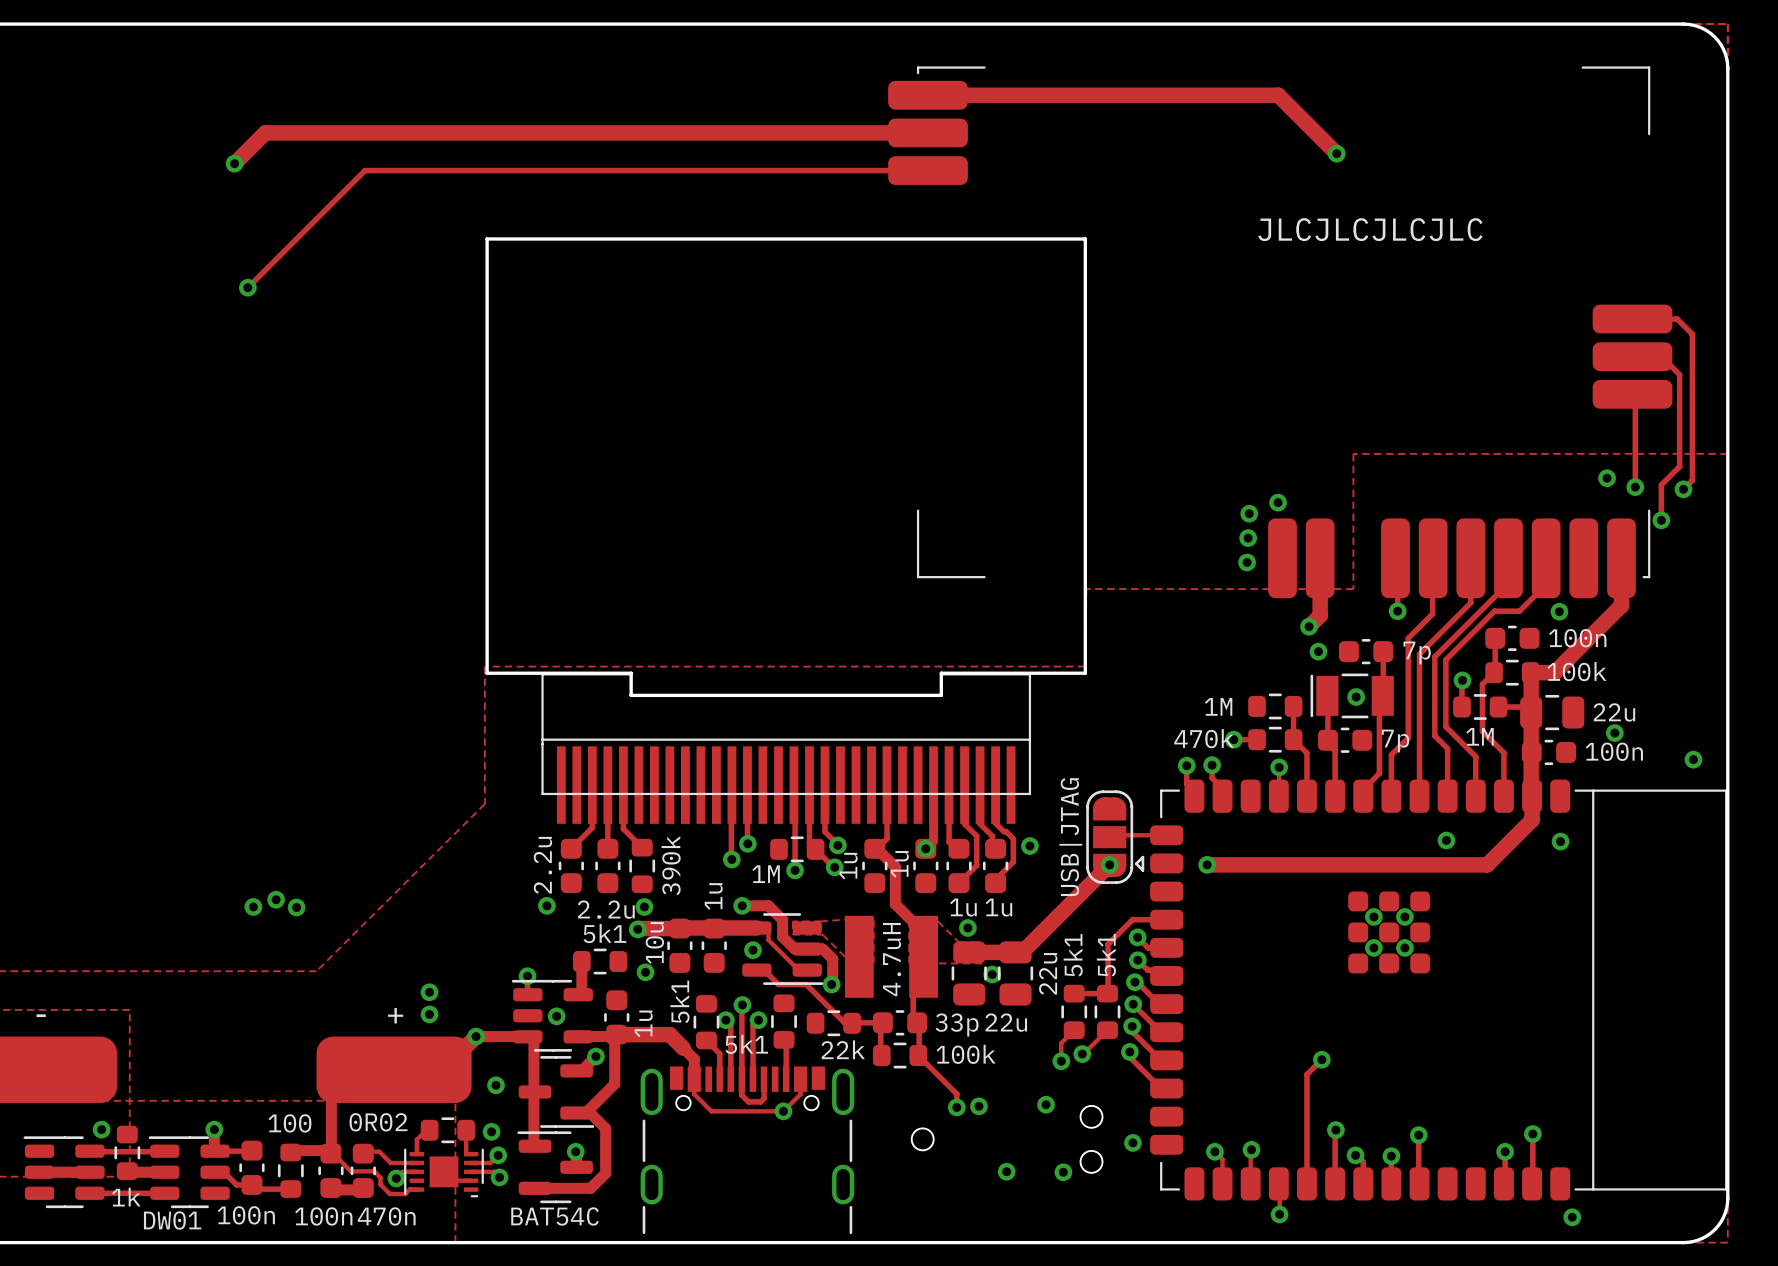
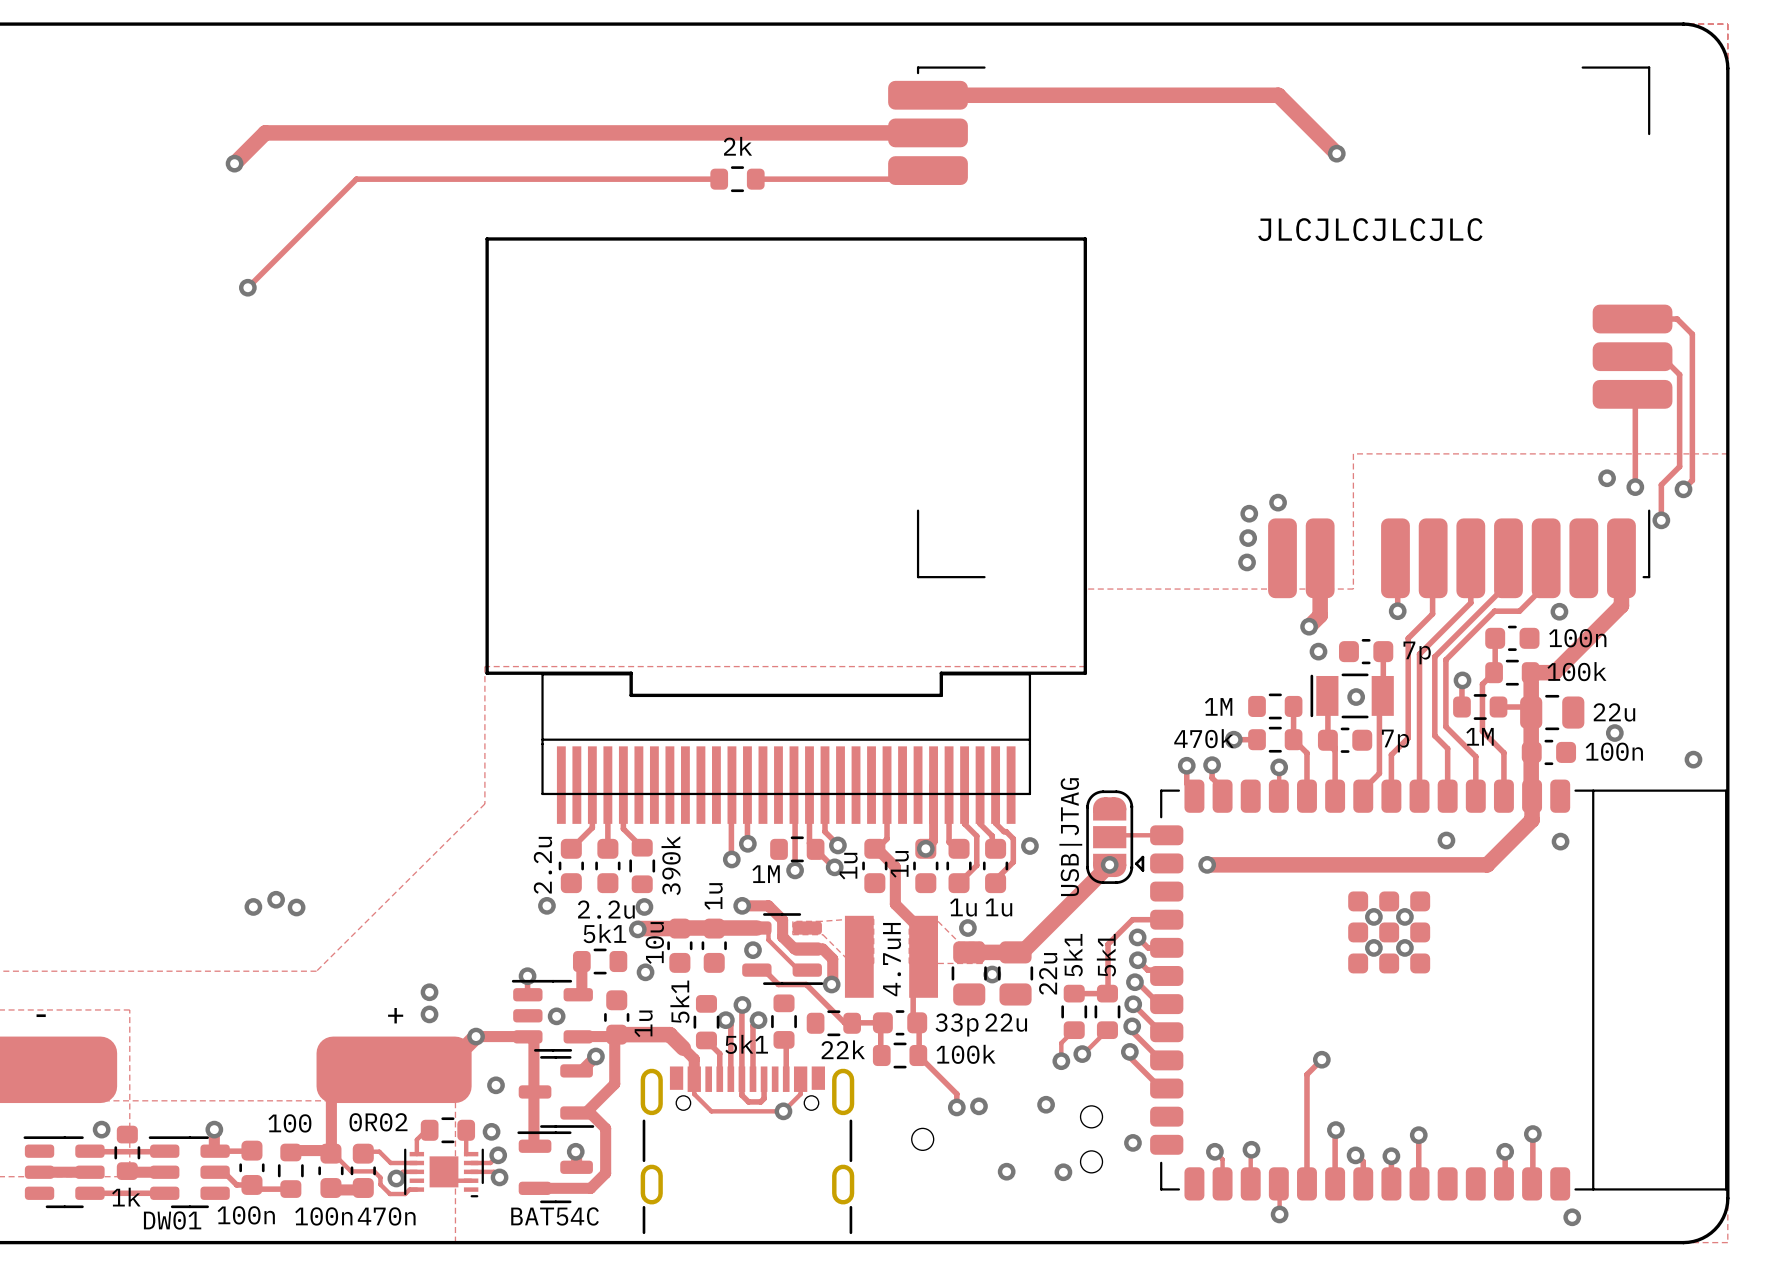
track: (928, 170) (365, 170) (356, 179) -> (719, 179) (356, 179)
part: none -> 2k (737, 179)
track: none -> (755, 179) (919, 179)

